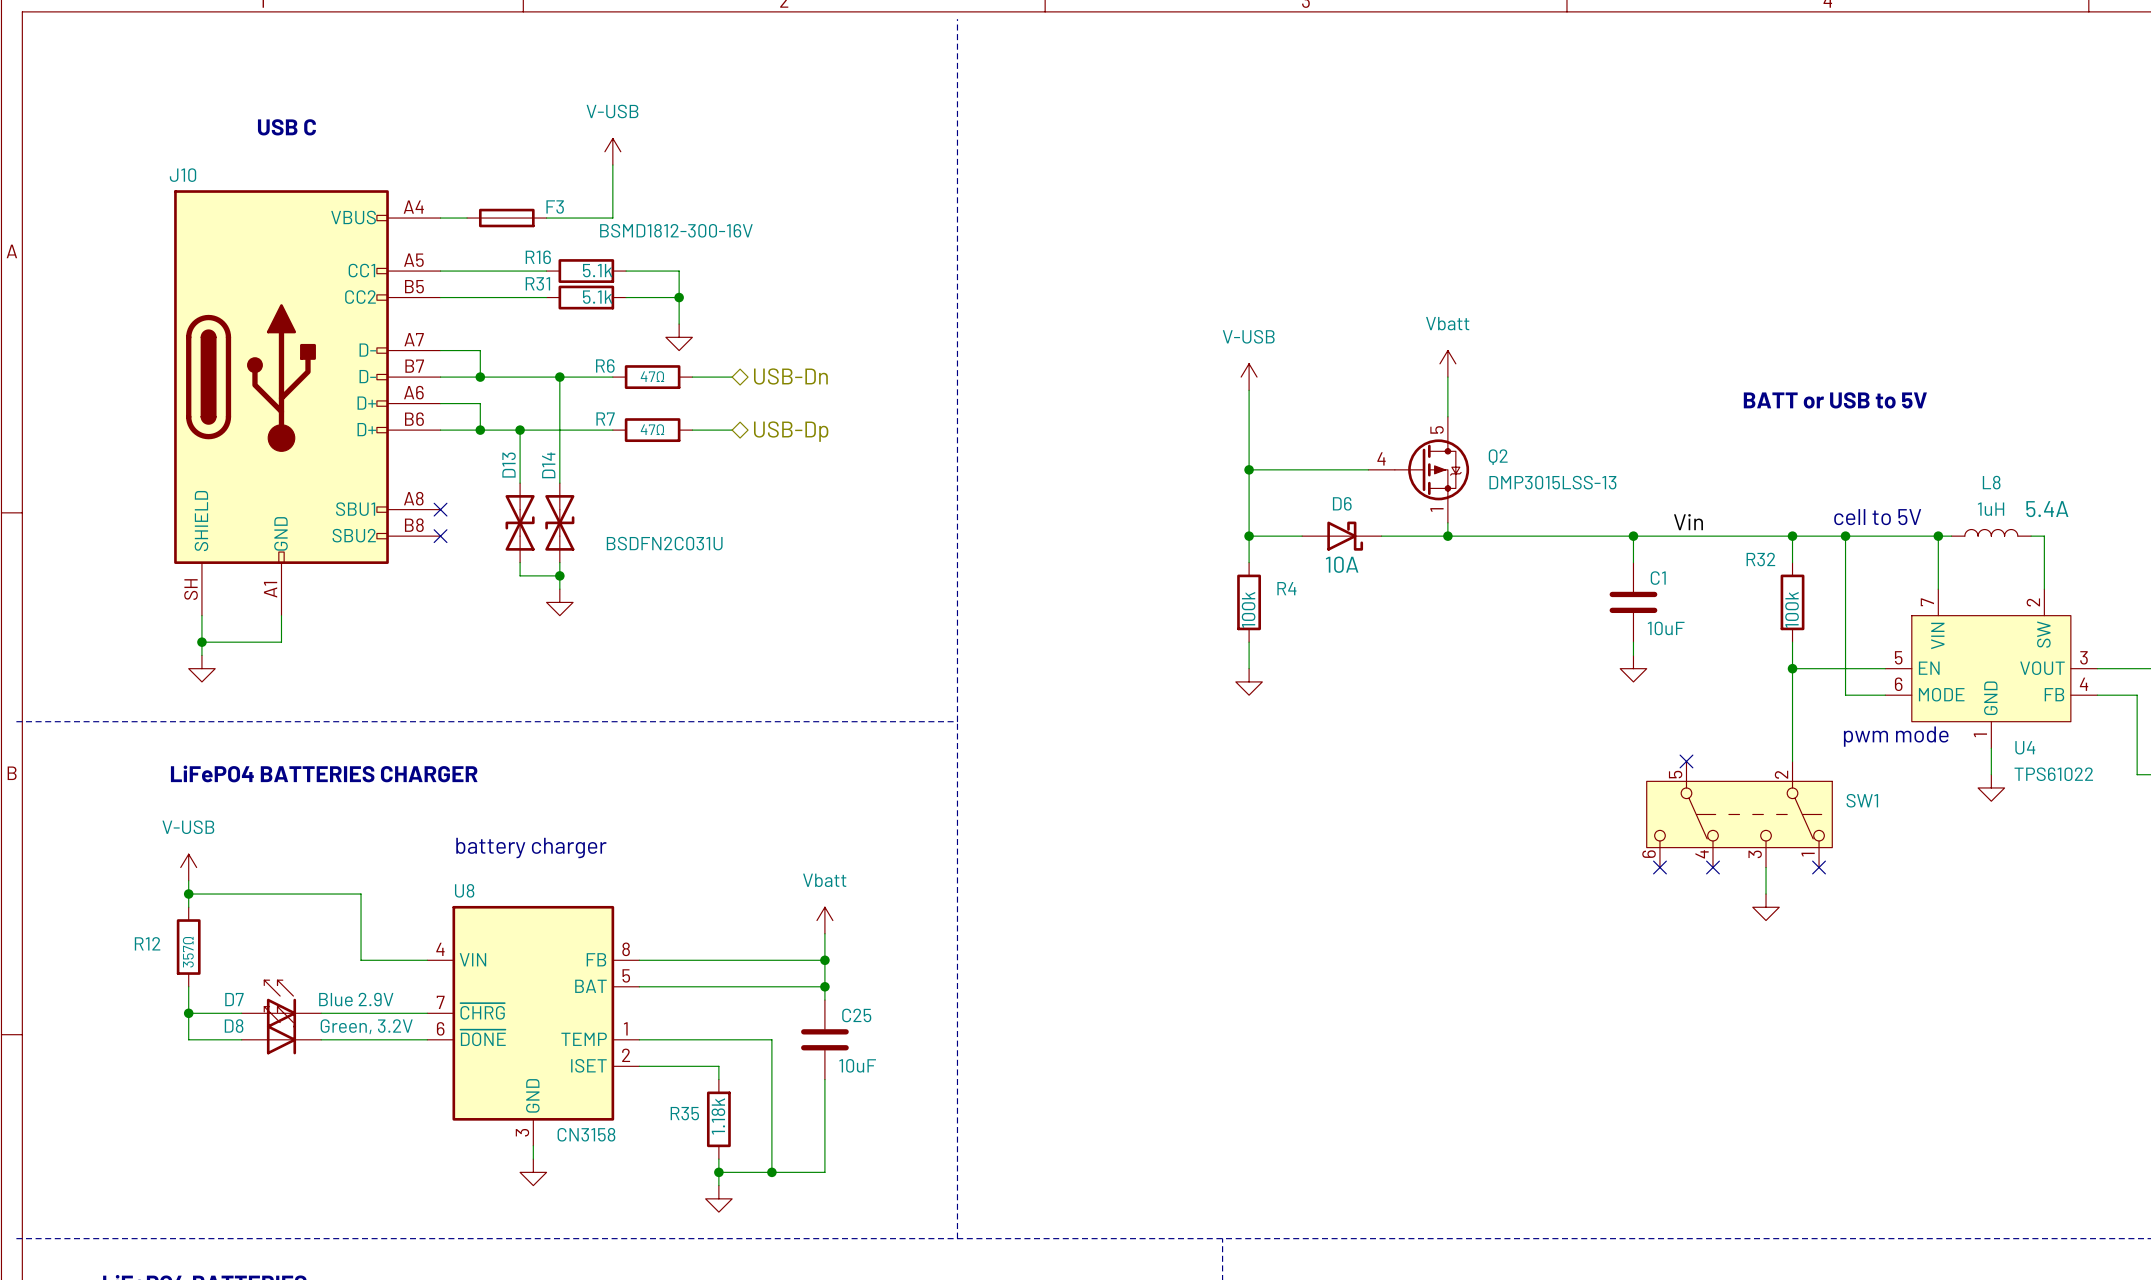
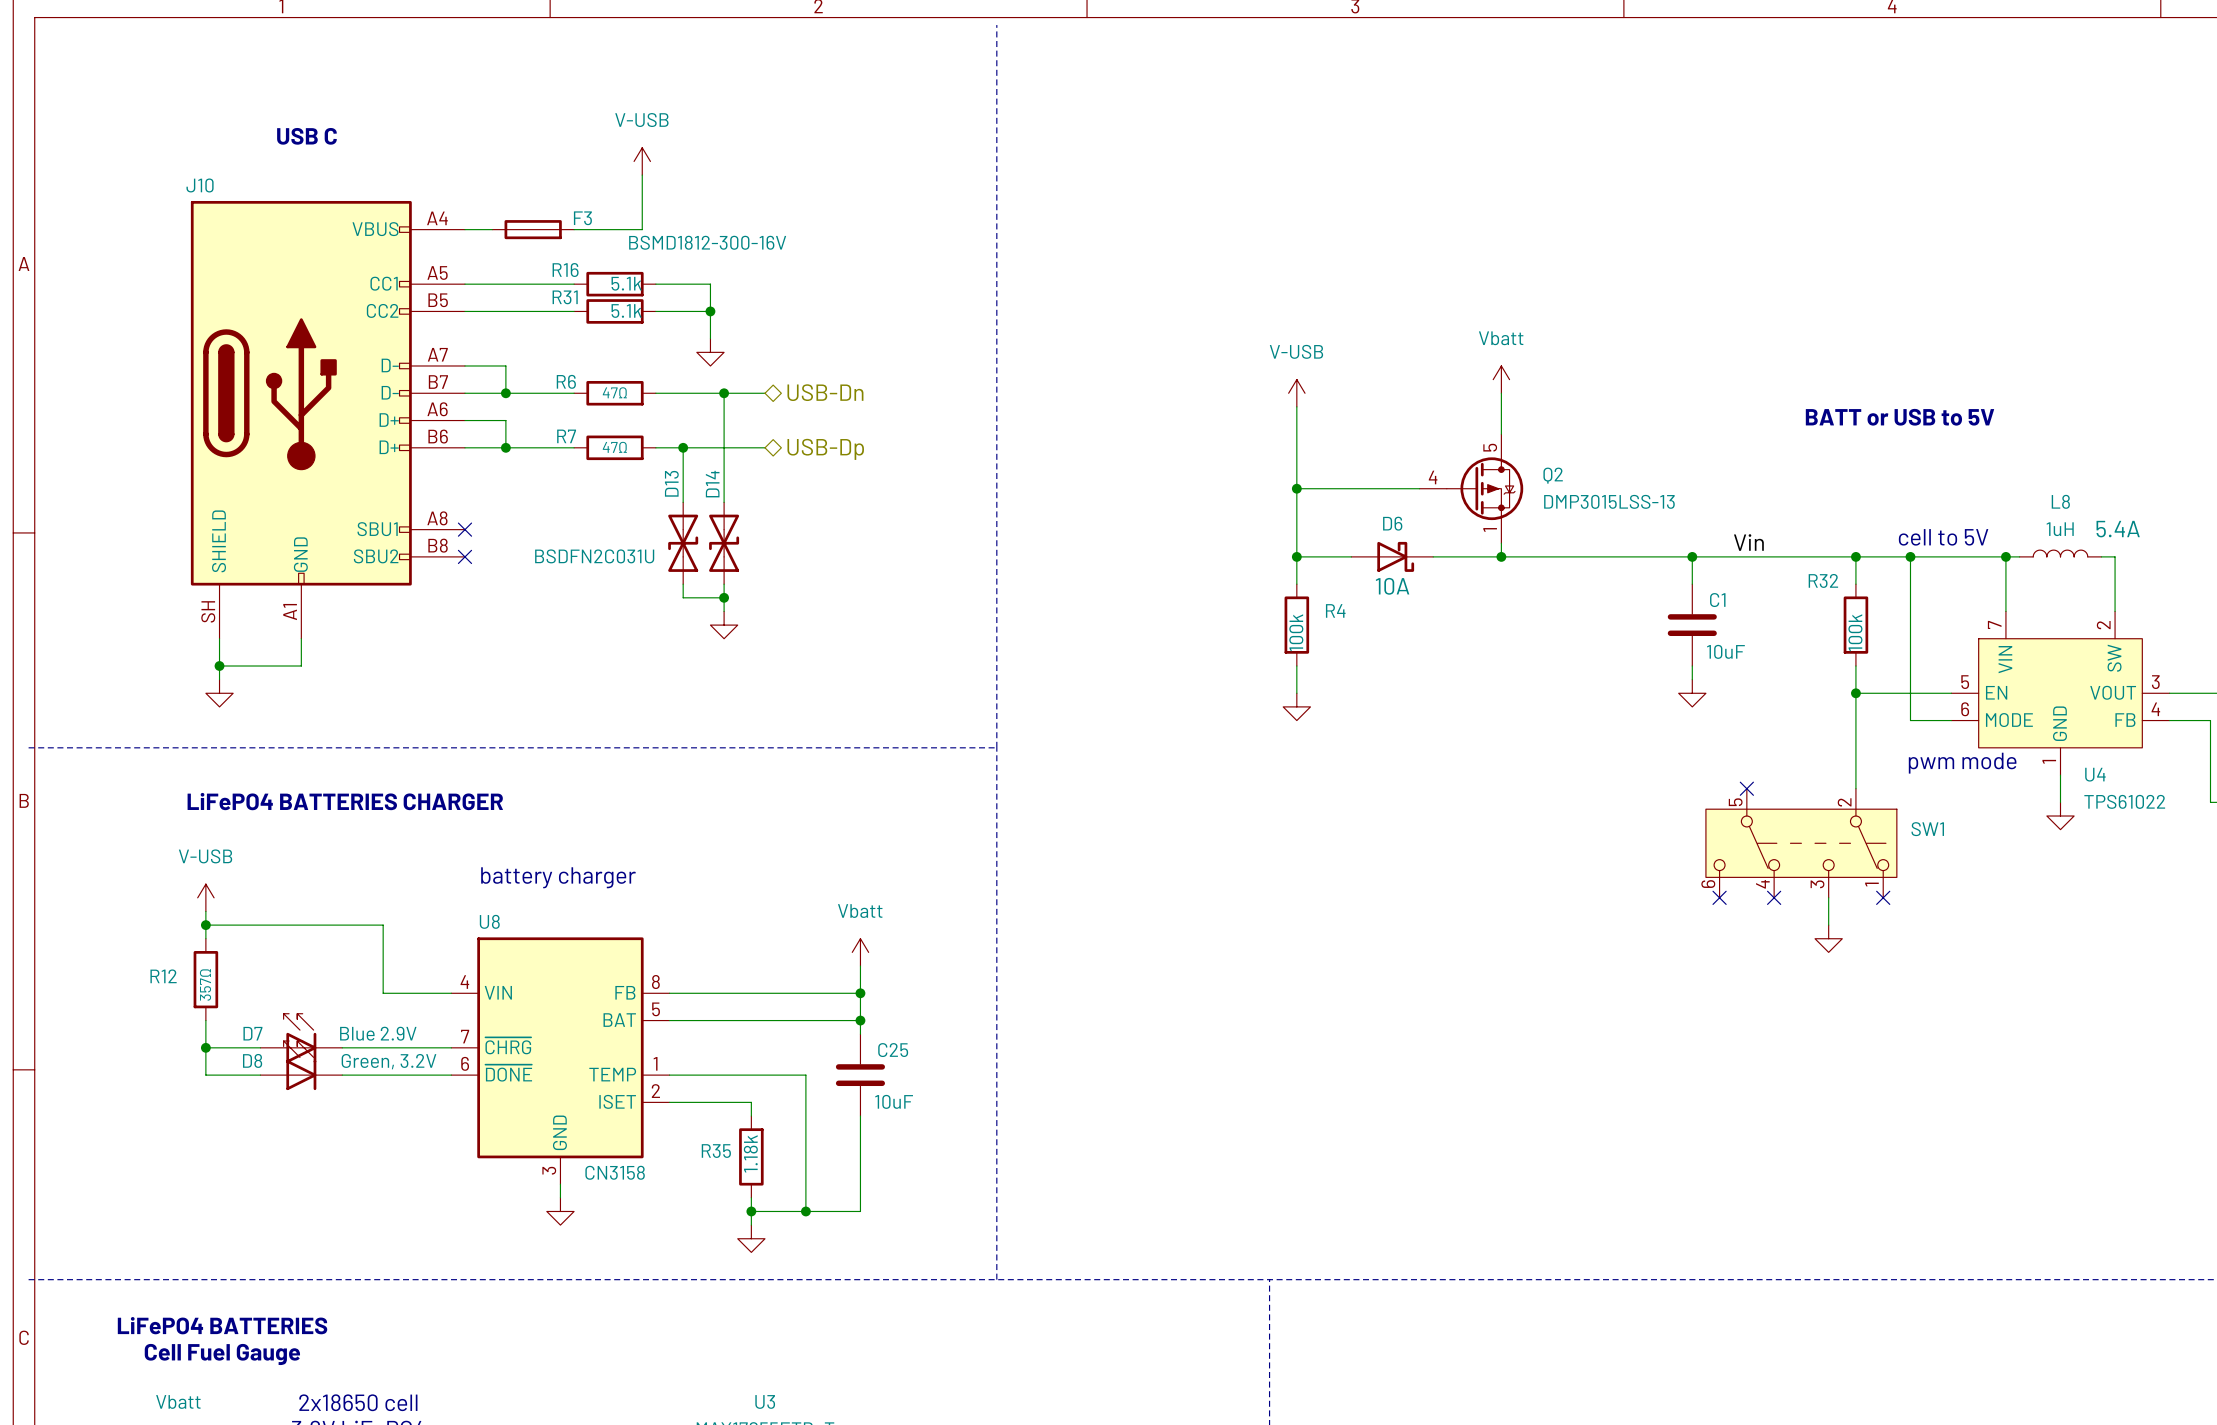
wire: (546, 377) (612, 377) -> none
wire: (559, 377) (559, 483) -> none
junction: (559, 377) -> none
wire: none -> (655, 393) (724, 393) (724, 502)
R6 position: (652, 377) -> (614, 393)
junction: none -> (724, 393)
wire: (520, 430) (520, 483) -> (683, 447) (683, 502)
junction: (520, 430) -> none
wire: (546, 430) (612, 430) -> (655, 447) (724, 447)
junction: none -> (683, 447)
R7 position: (652, 430) -> (614, 447)
D13 position: (520, 522) -> (683, 543)
D14 position: (559, 522) -> (724, 543)
D13 value position: BSDFN2C031U (664, 543) -> BSDFN2C031U (594, 556)
wire: (520, 562) (520, 575) (559, 575) -> (683, 584) (683, 597) (724, 597)
wire: (559, 562) (559, 589) -> (724, 584) (724, 611)
junction: (559, 575) -> none
junction: none -> (724, 597)
power symbol position: (559, 602) -> (724, 625)

